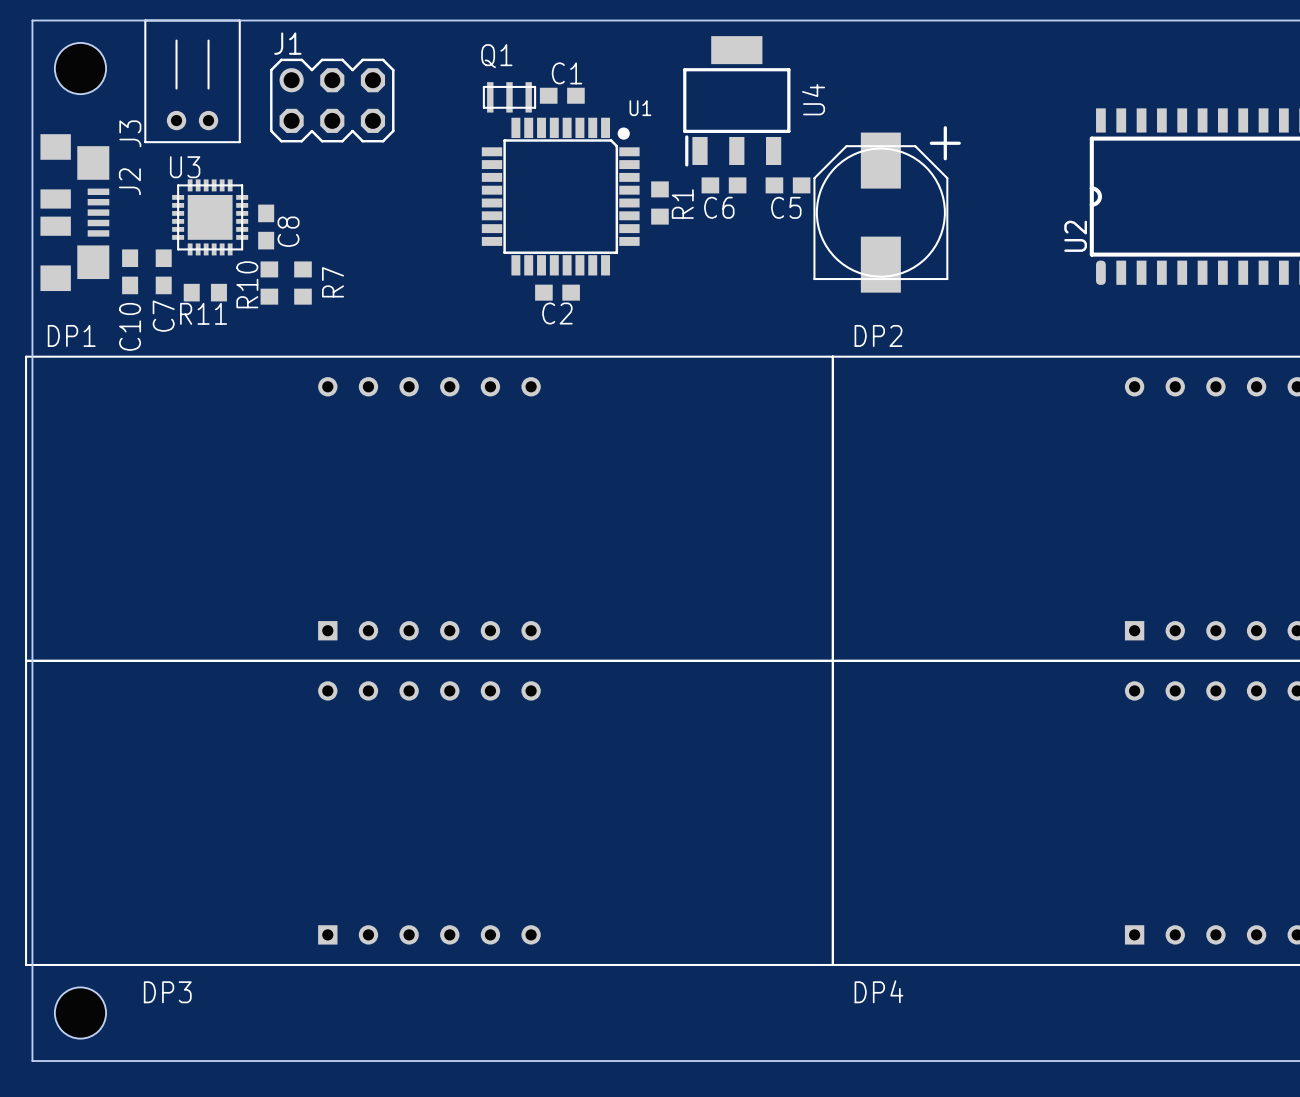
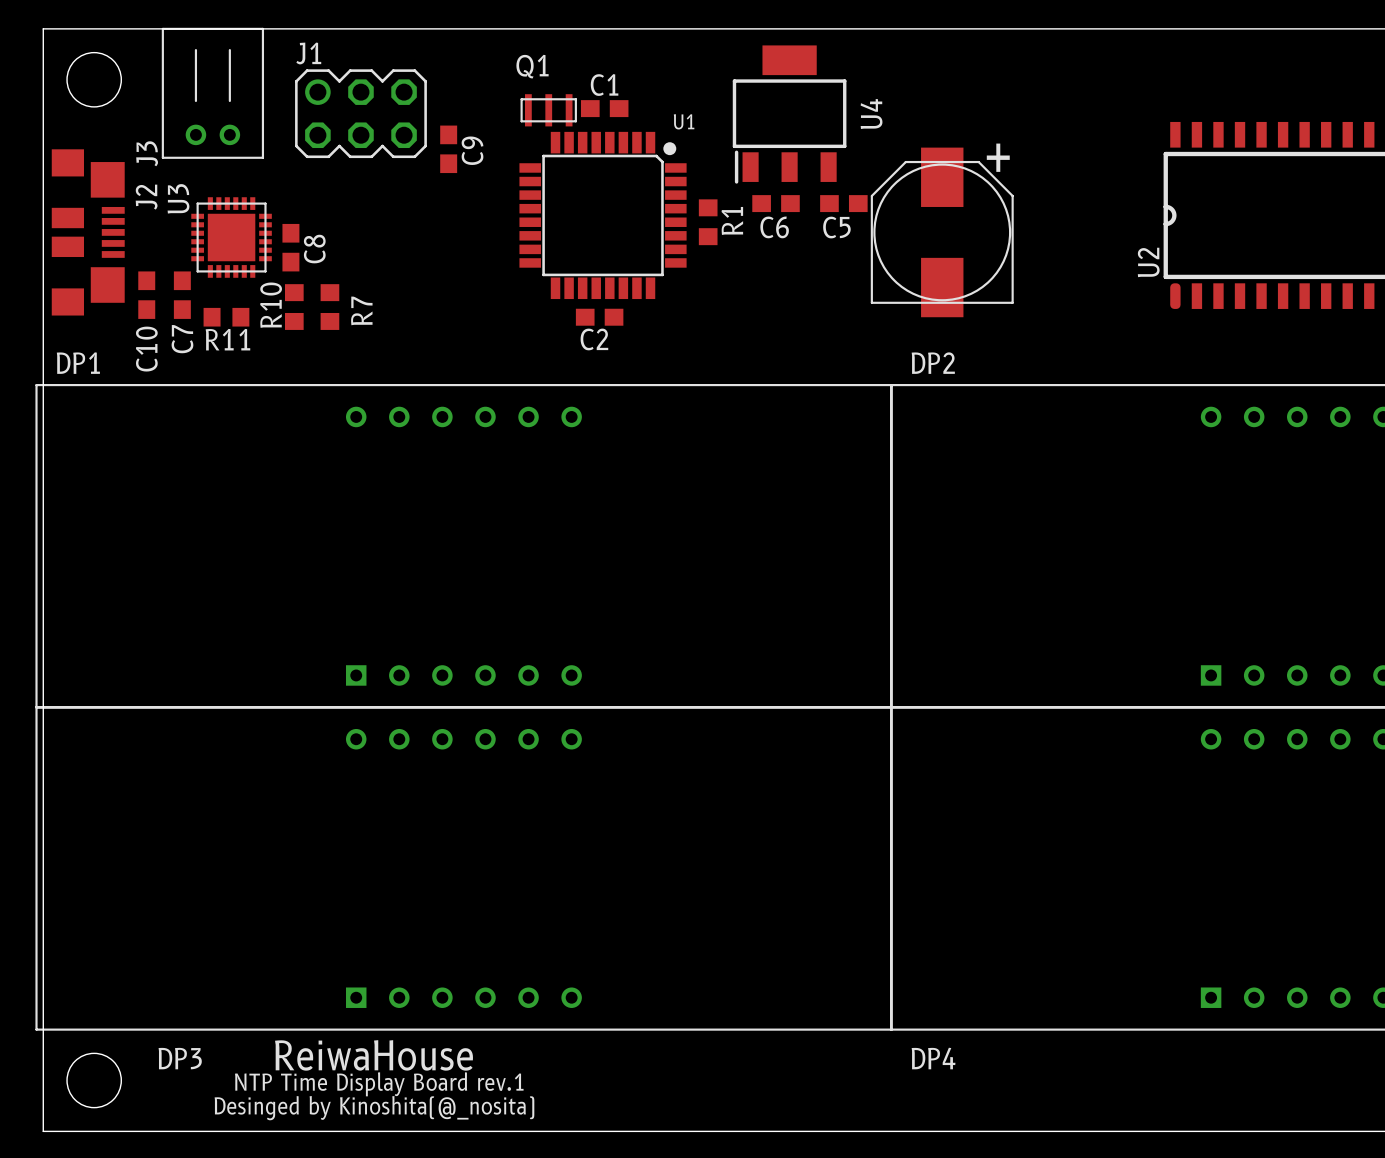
C9: none -> (448, 149)
U3 name rotation: 0° (185, 167) -> 90° counterclockwise (178, 198)
text: none -> ReiwaHouse (374, 1055)
text: none -> NTP Time Display Board rev.1 (379, 1084)
text: none -> Desinged by Kinoshita(@_nosita) (374, 1108)

